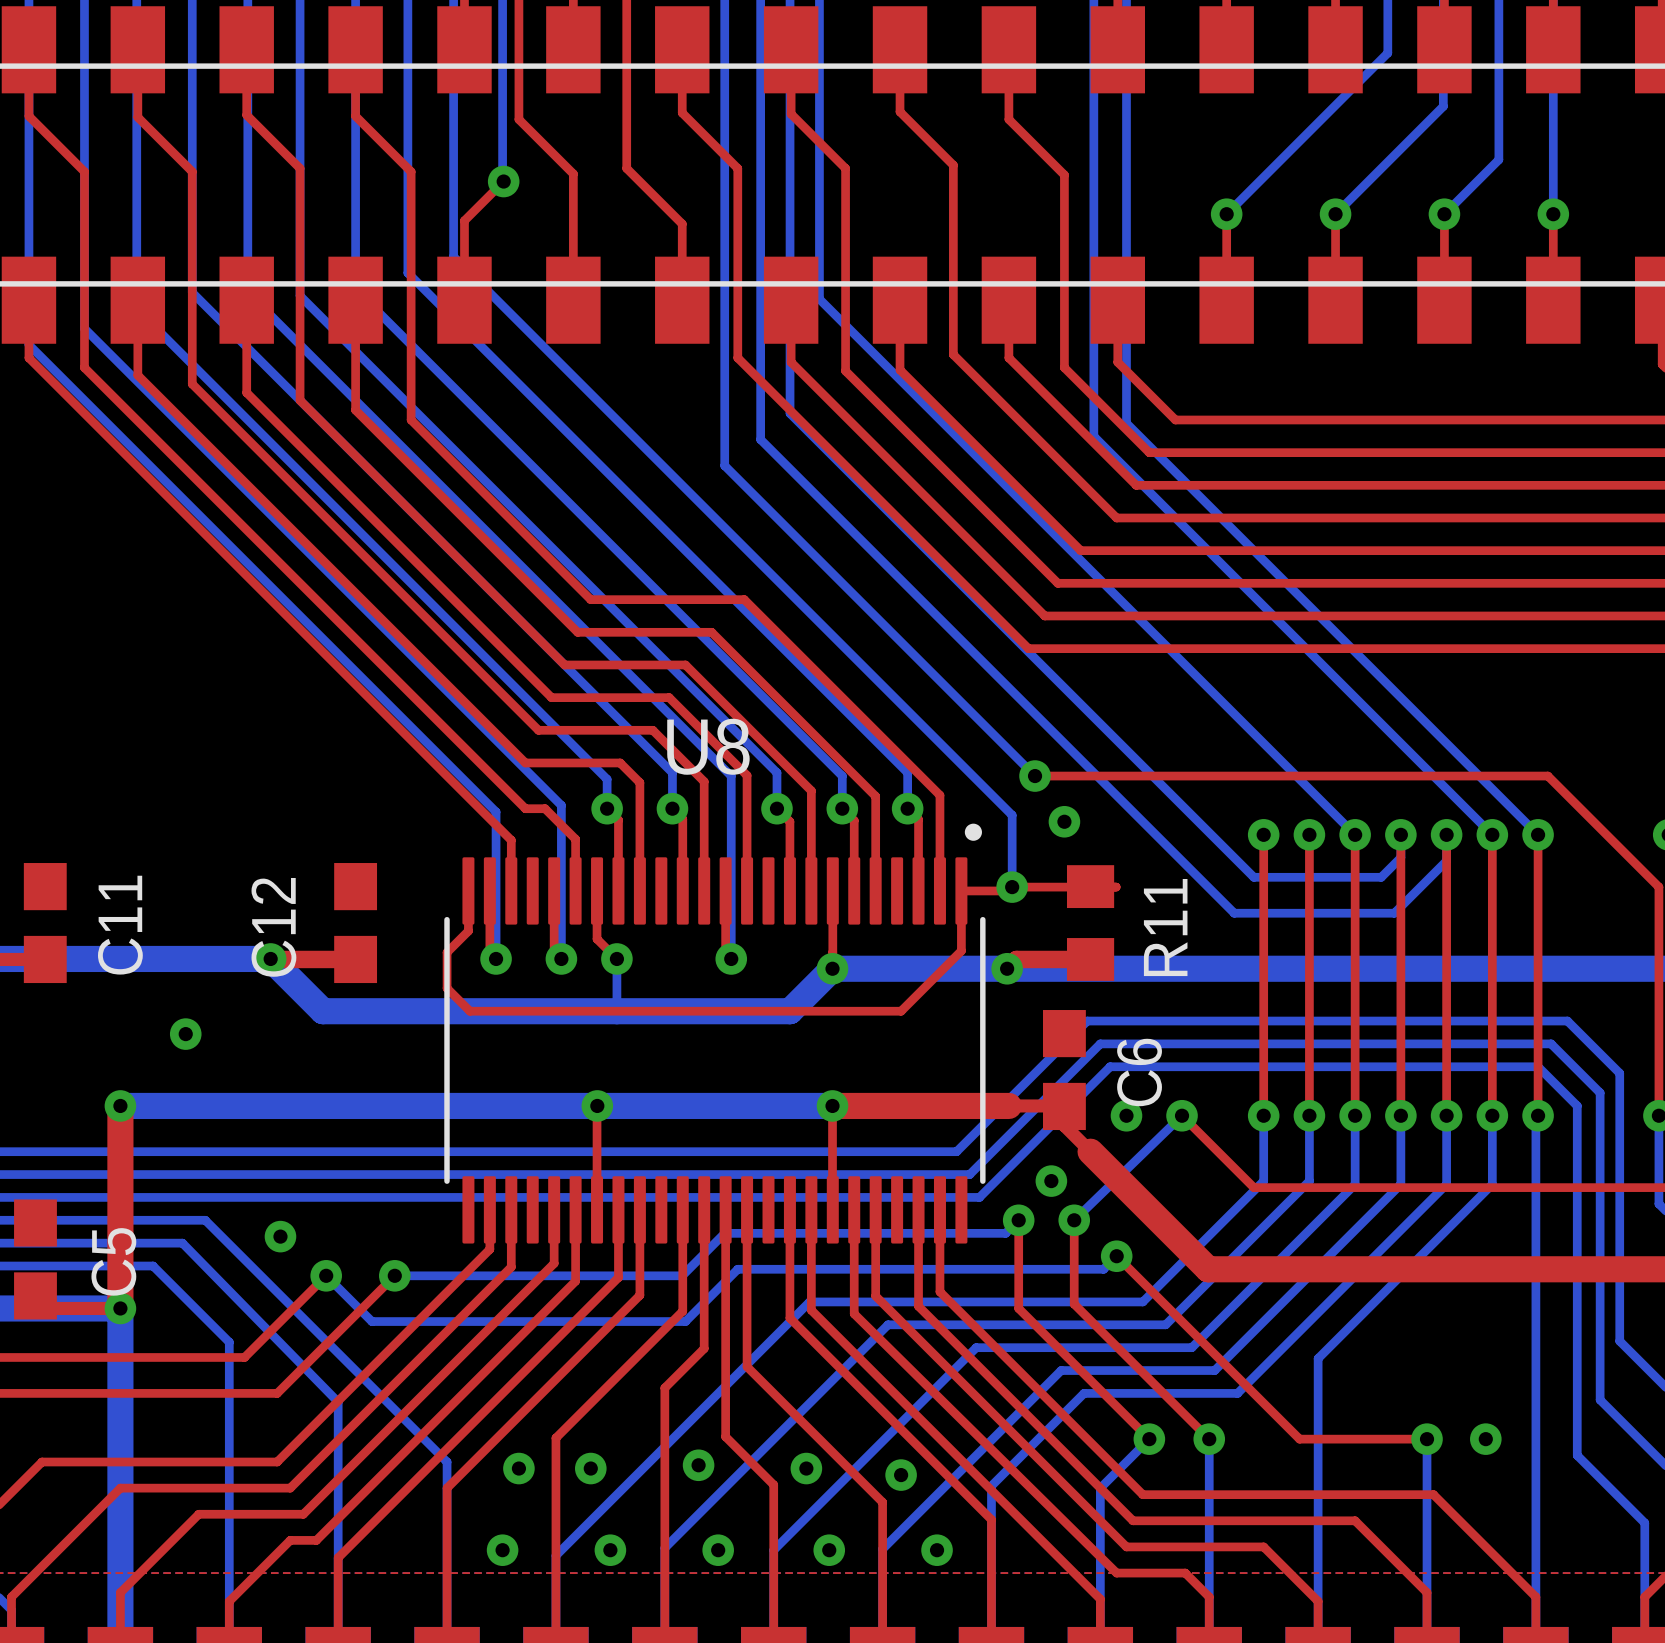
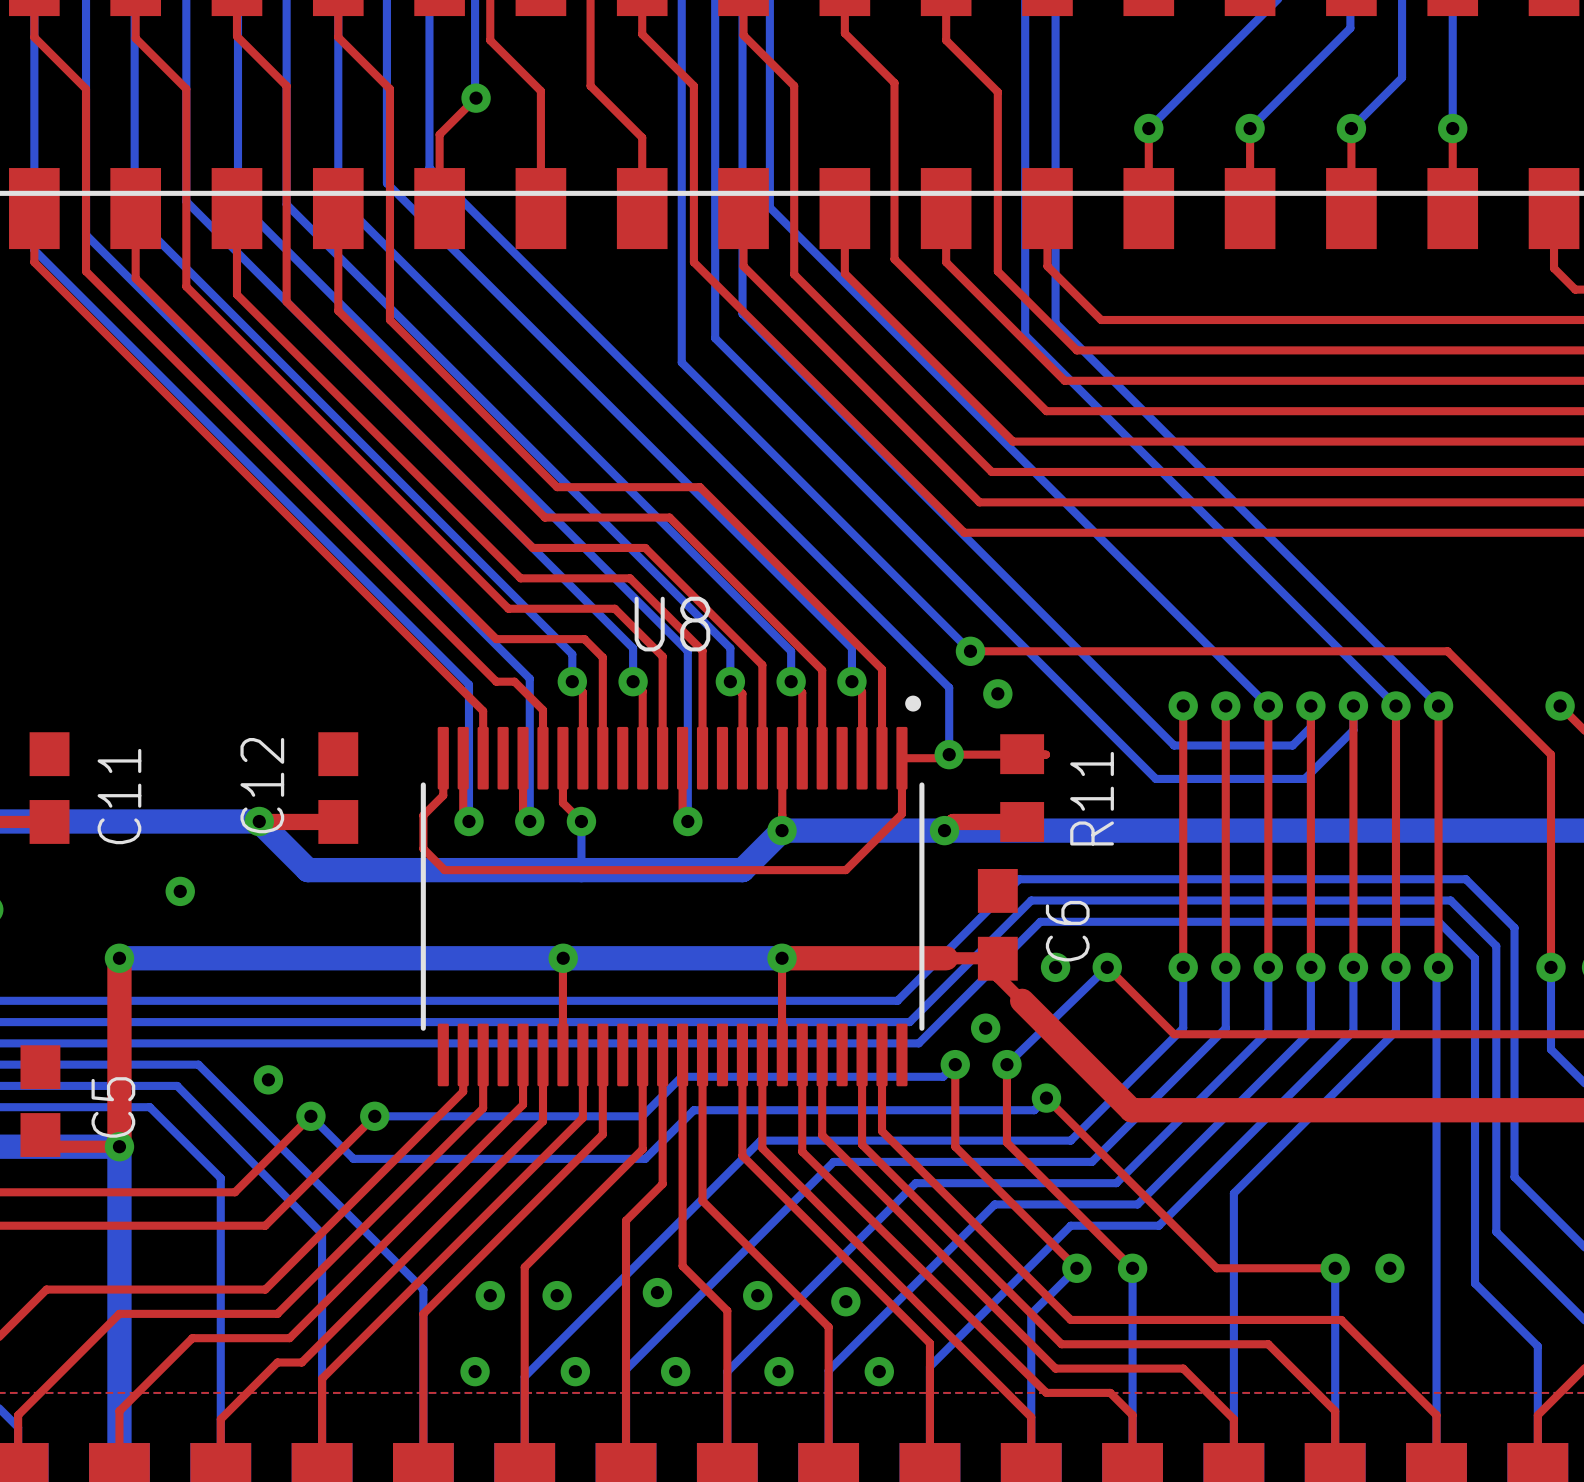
bottom track: (1142, 1393) (1084, 1393) (991, 1485) (991, 1544) -> (1070, 1225) (929, 1366)

